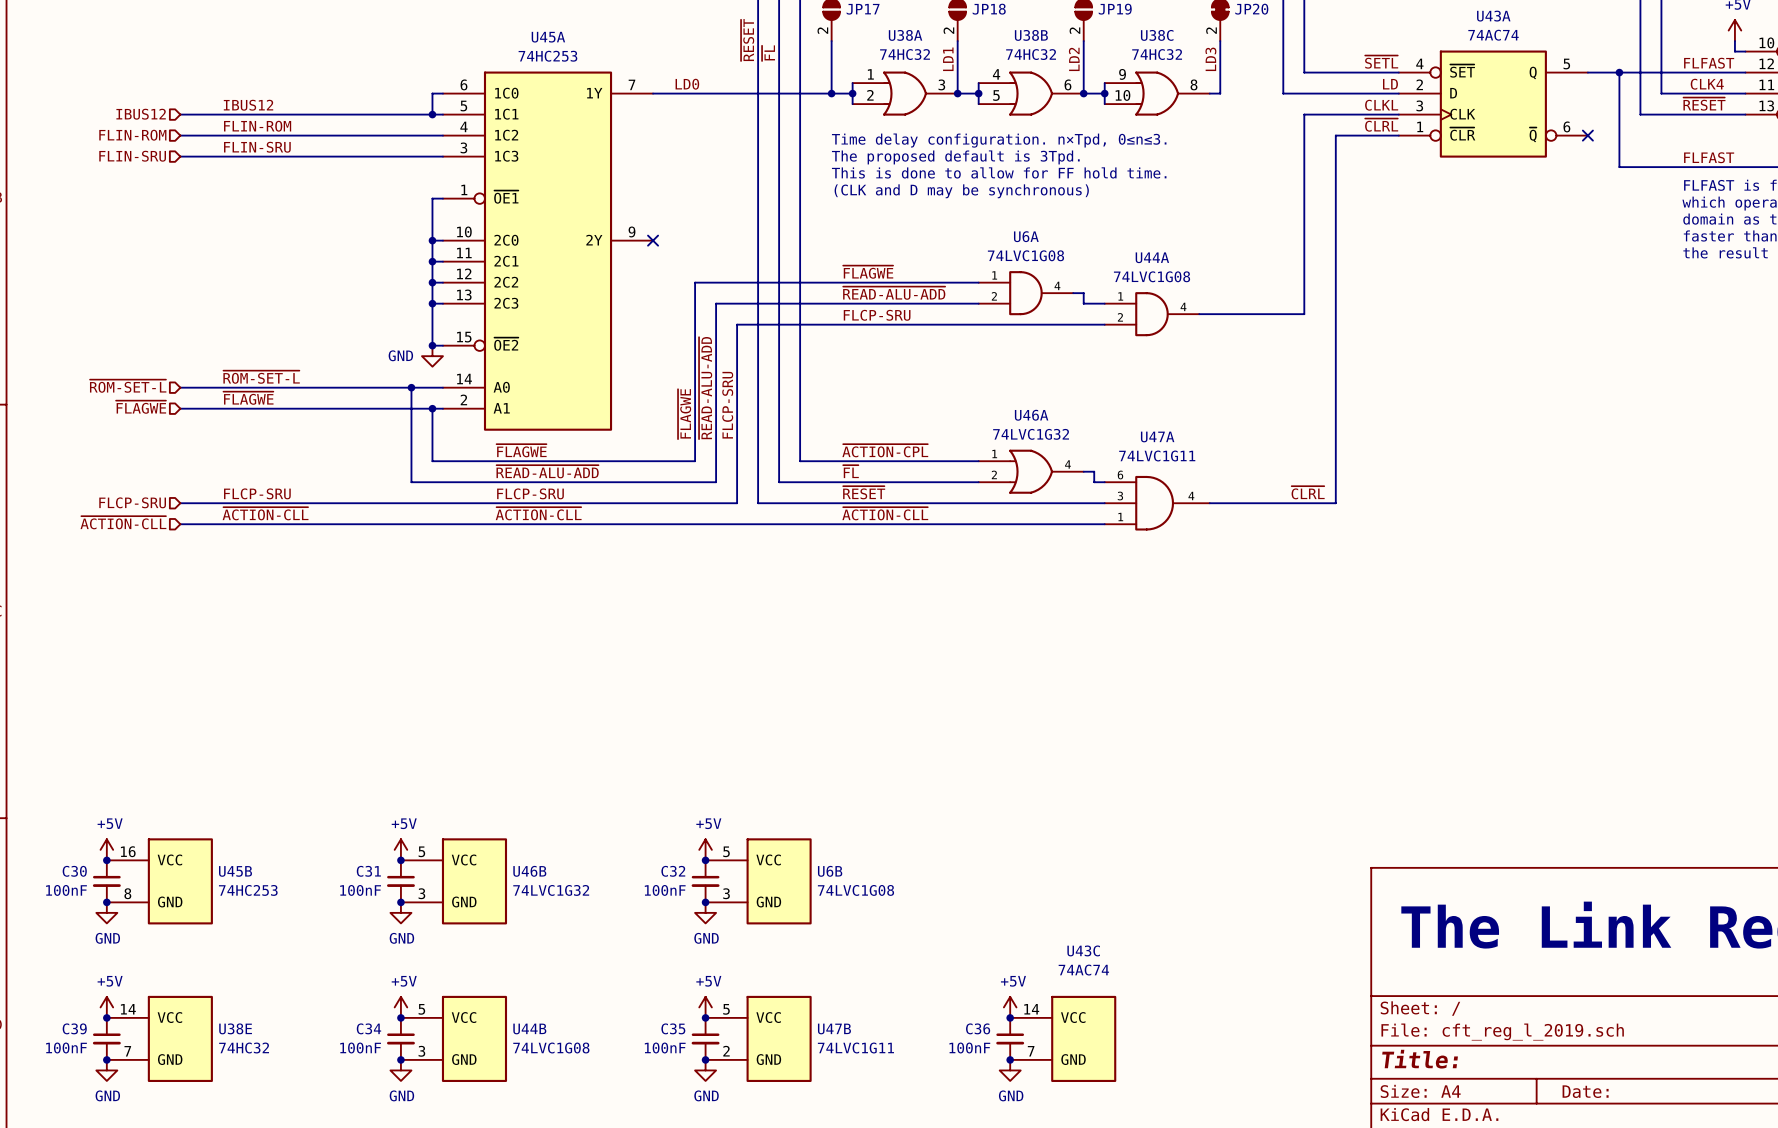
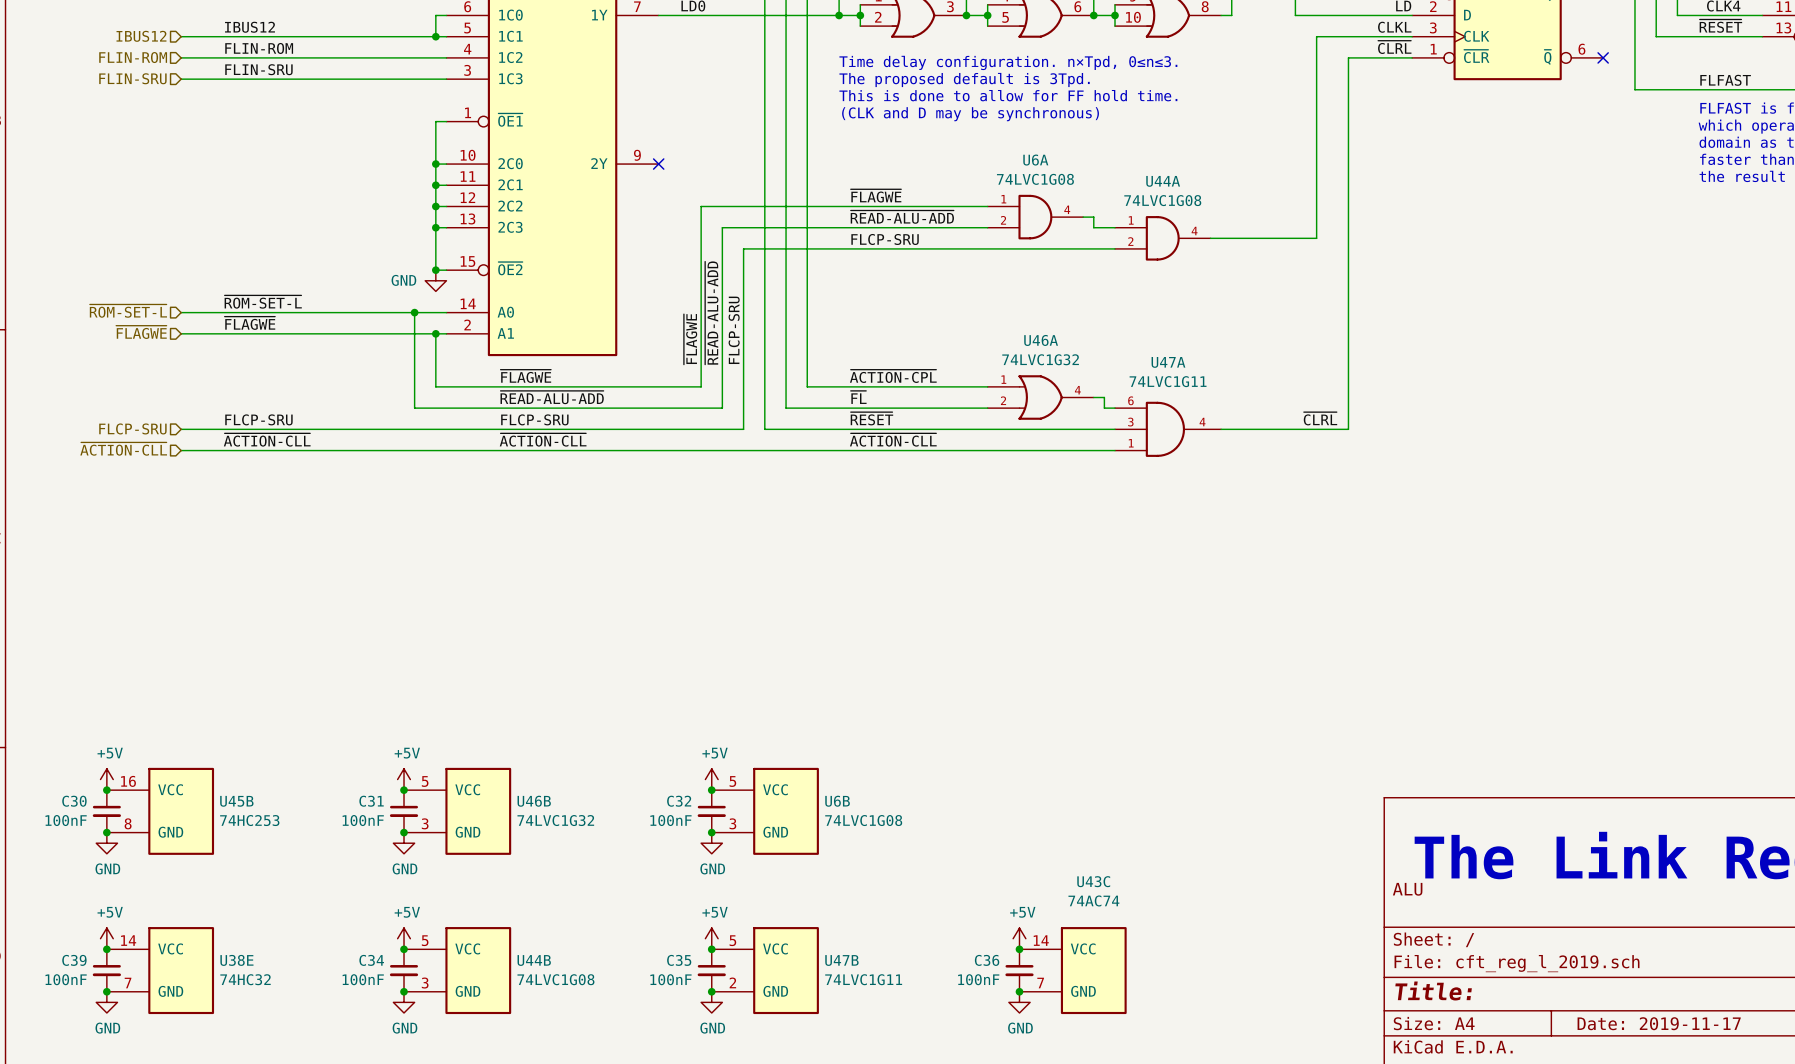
title block: none -> ALU (1407, 889)
title block: Date: (1585, 1091) -> Date: 2019-11-17 (1659, 1023)

